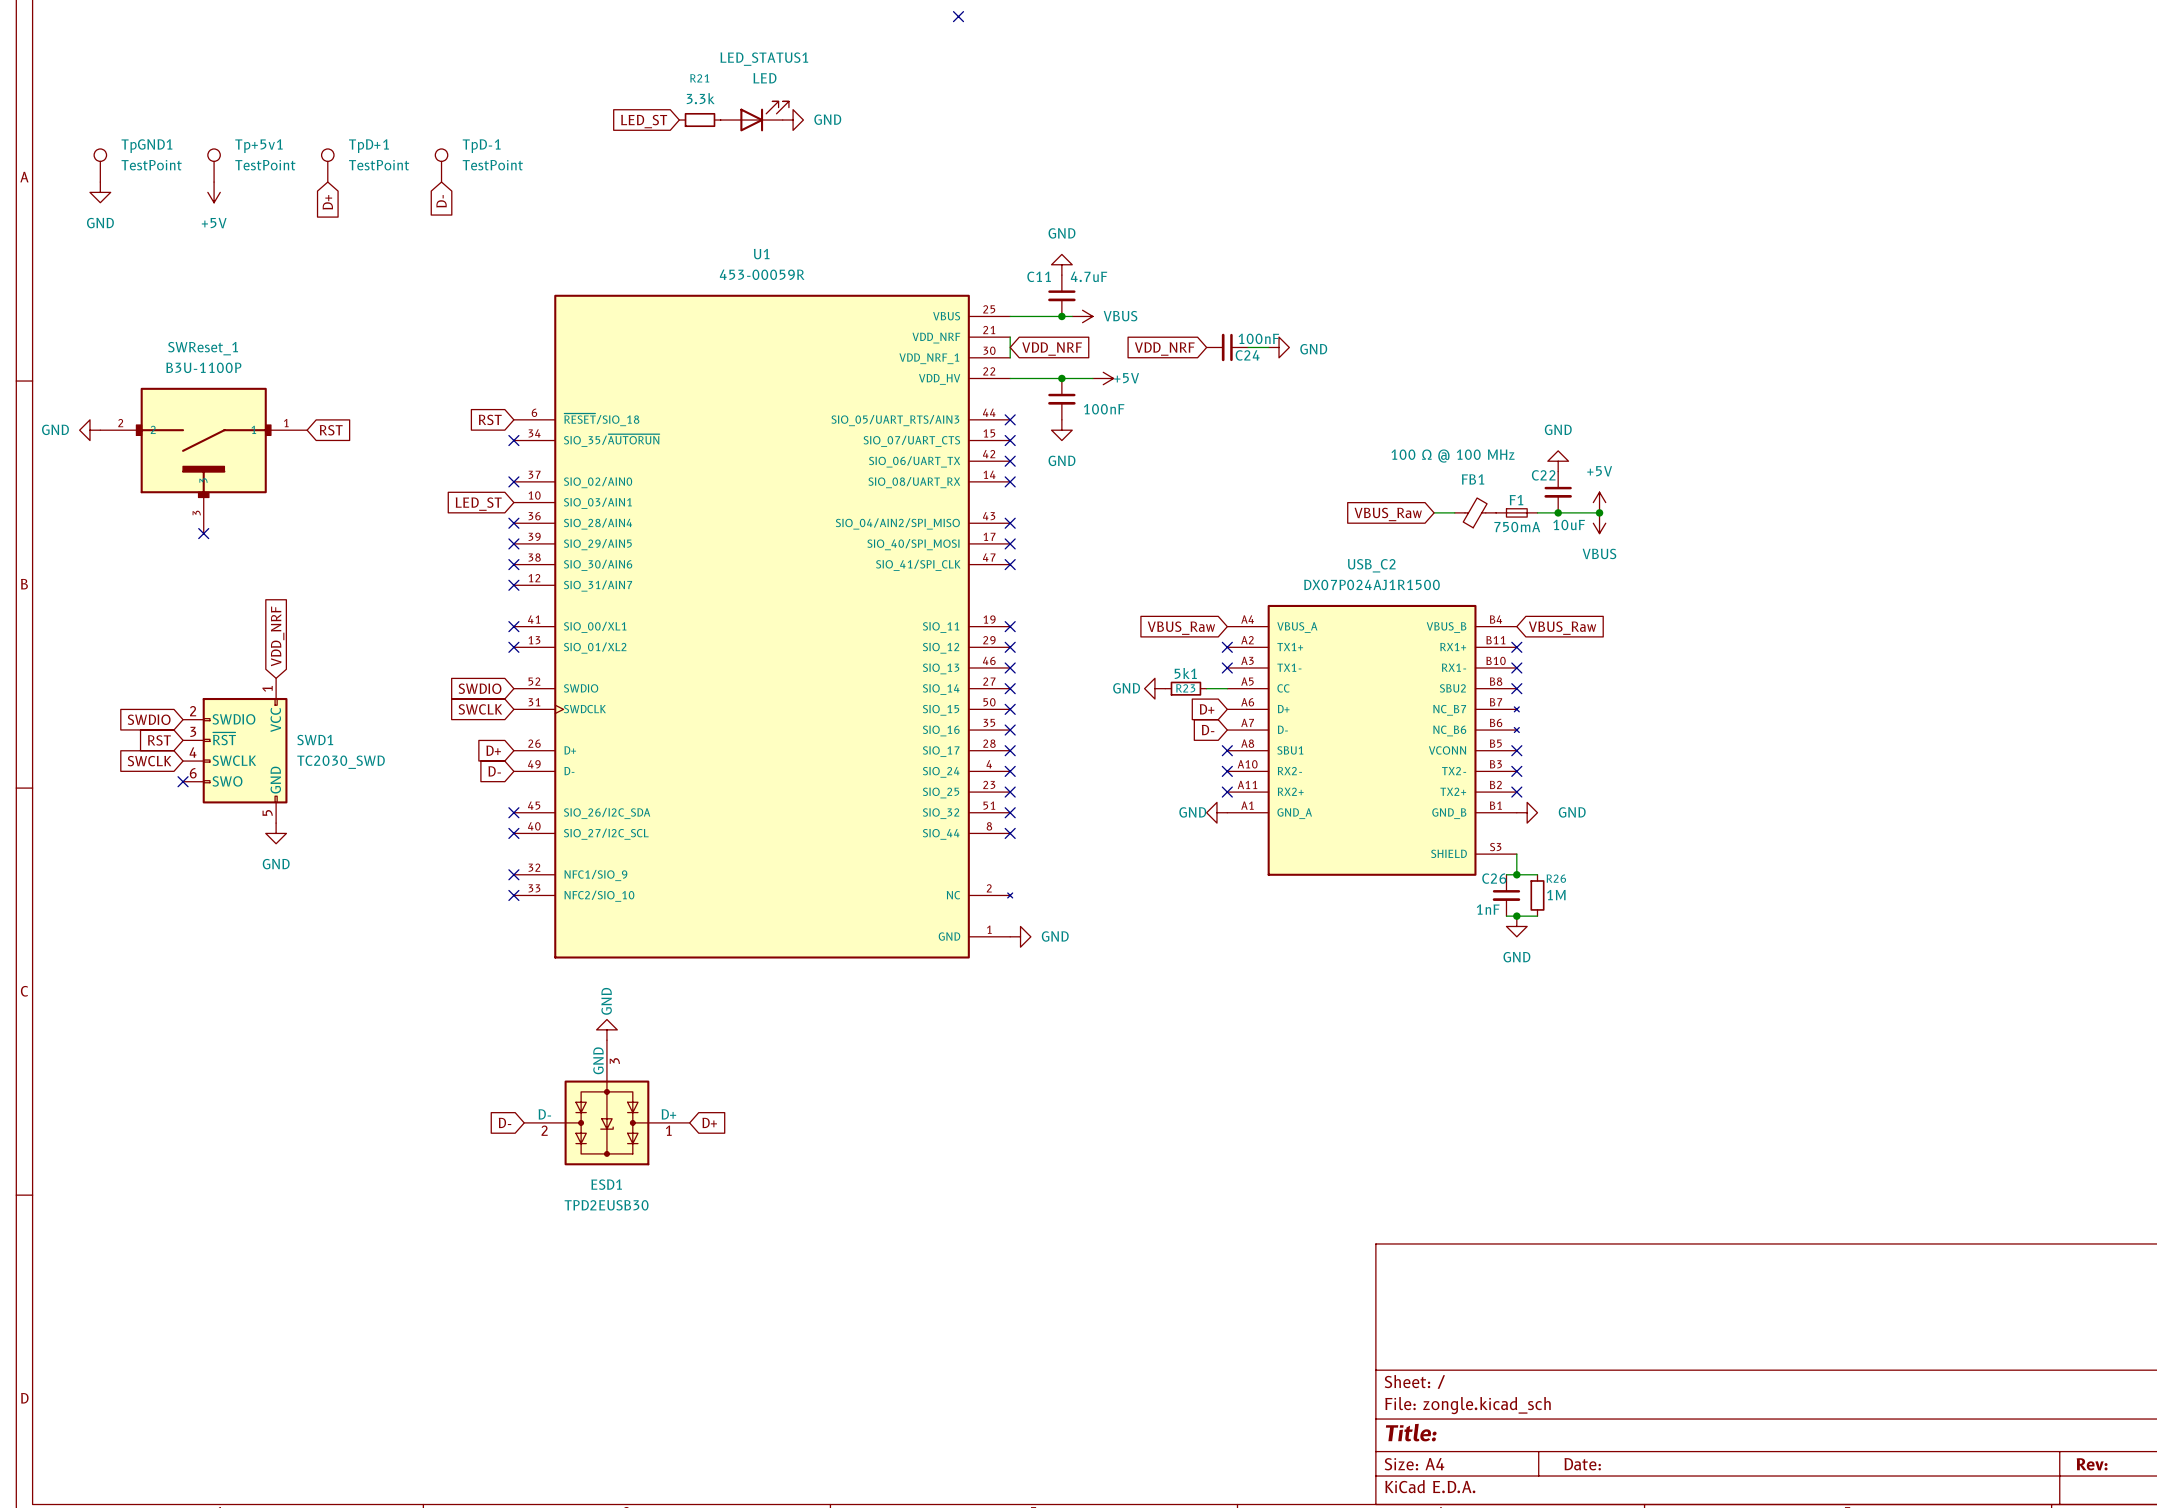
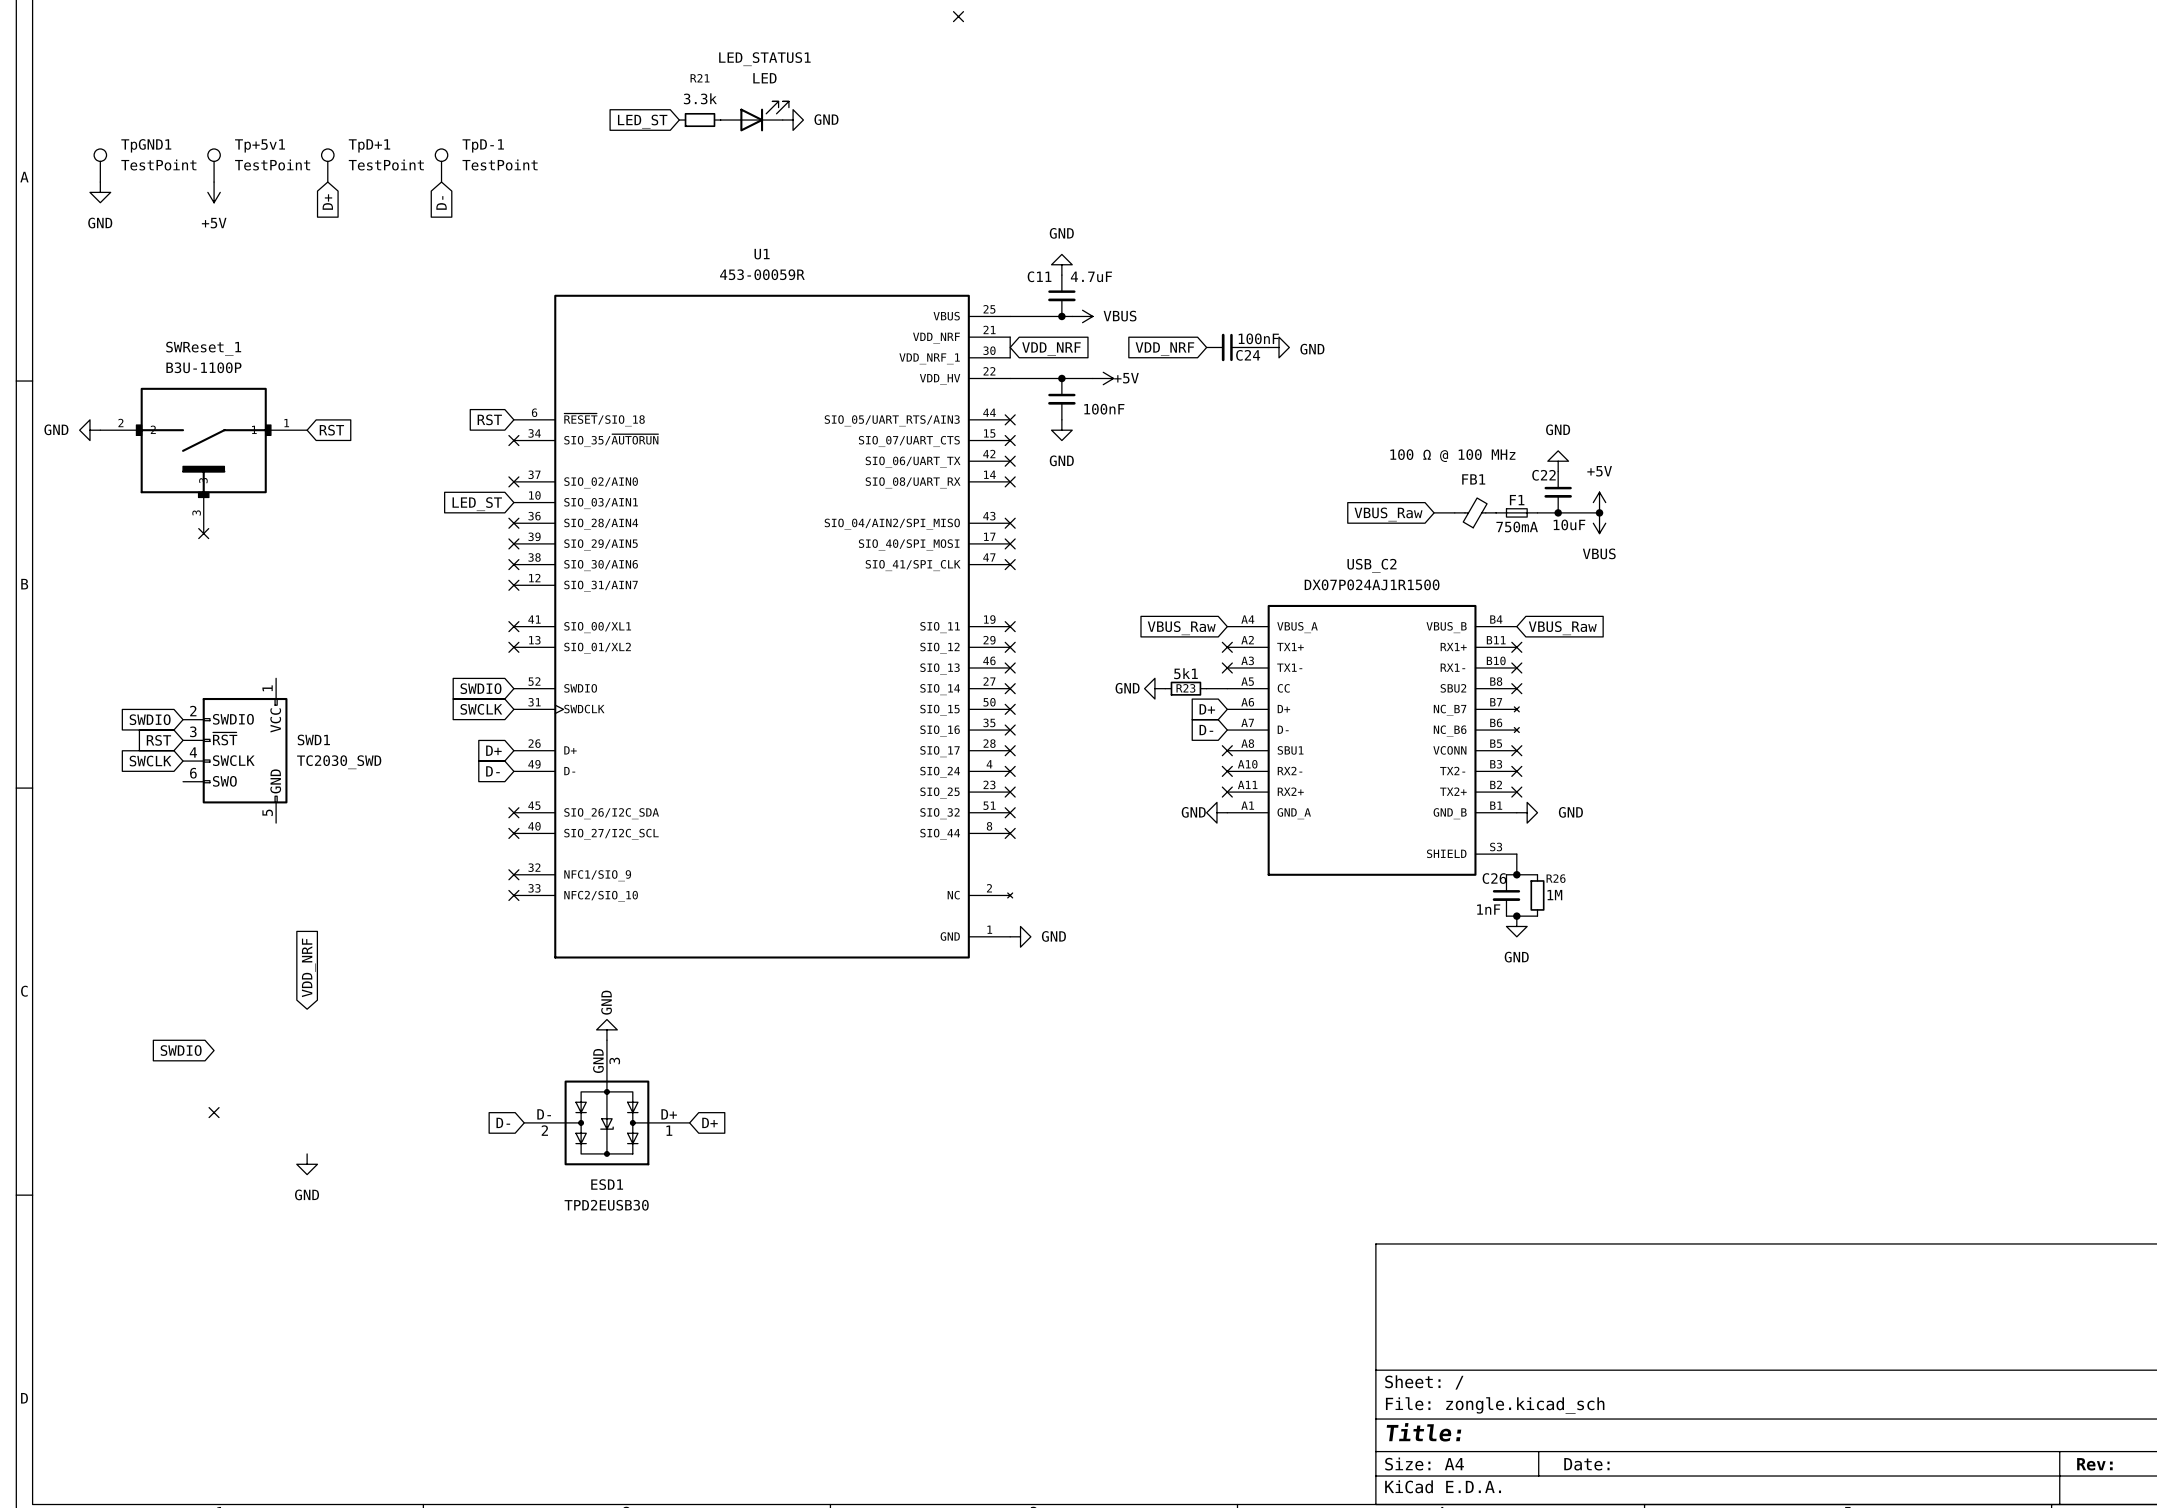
global label: VDD_NRF (277, 636) -> none
no-connect mark: (183, 781) -> none
power symbol: GND (276, 833) -> none
global label: none -> VDD_NRF (308, 967)
global label: none -> SWDIO (181, 1050)
no-connect mark: none -> (214, 1112)
power symbol: none -> GND (307, 1164)

